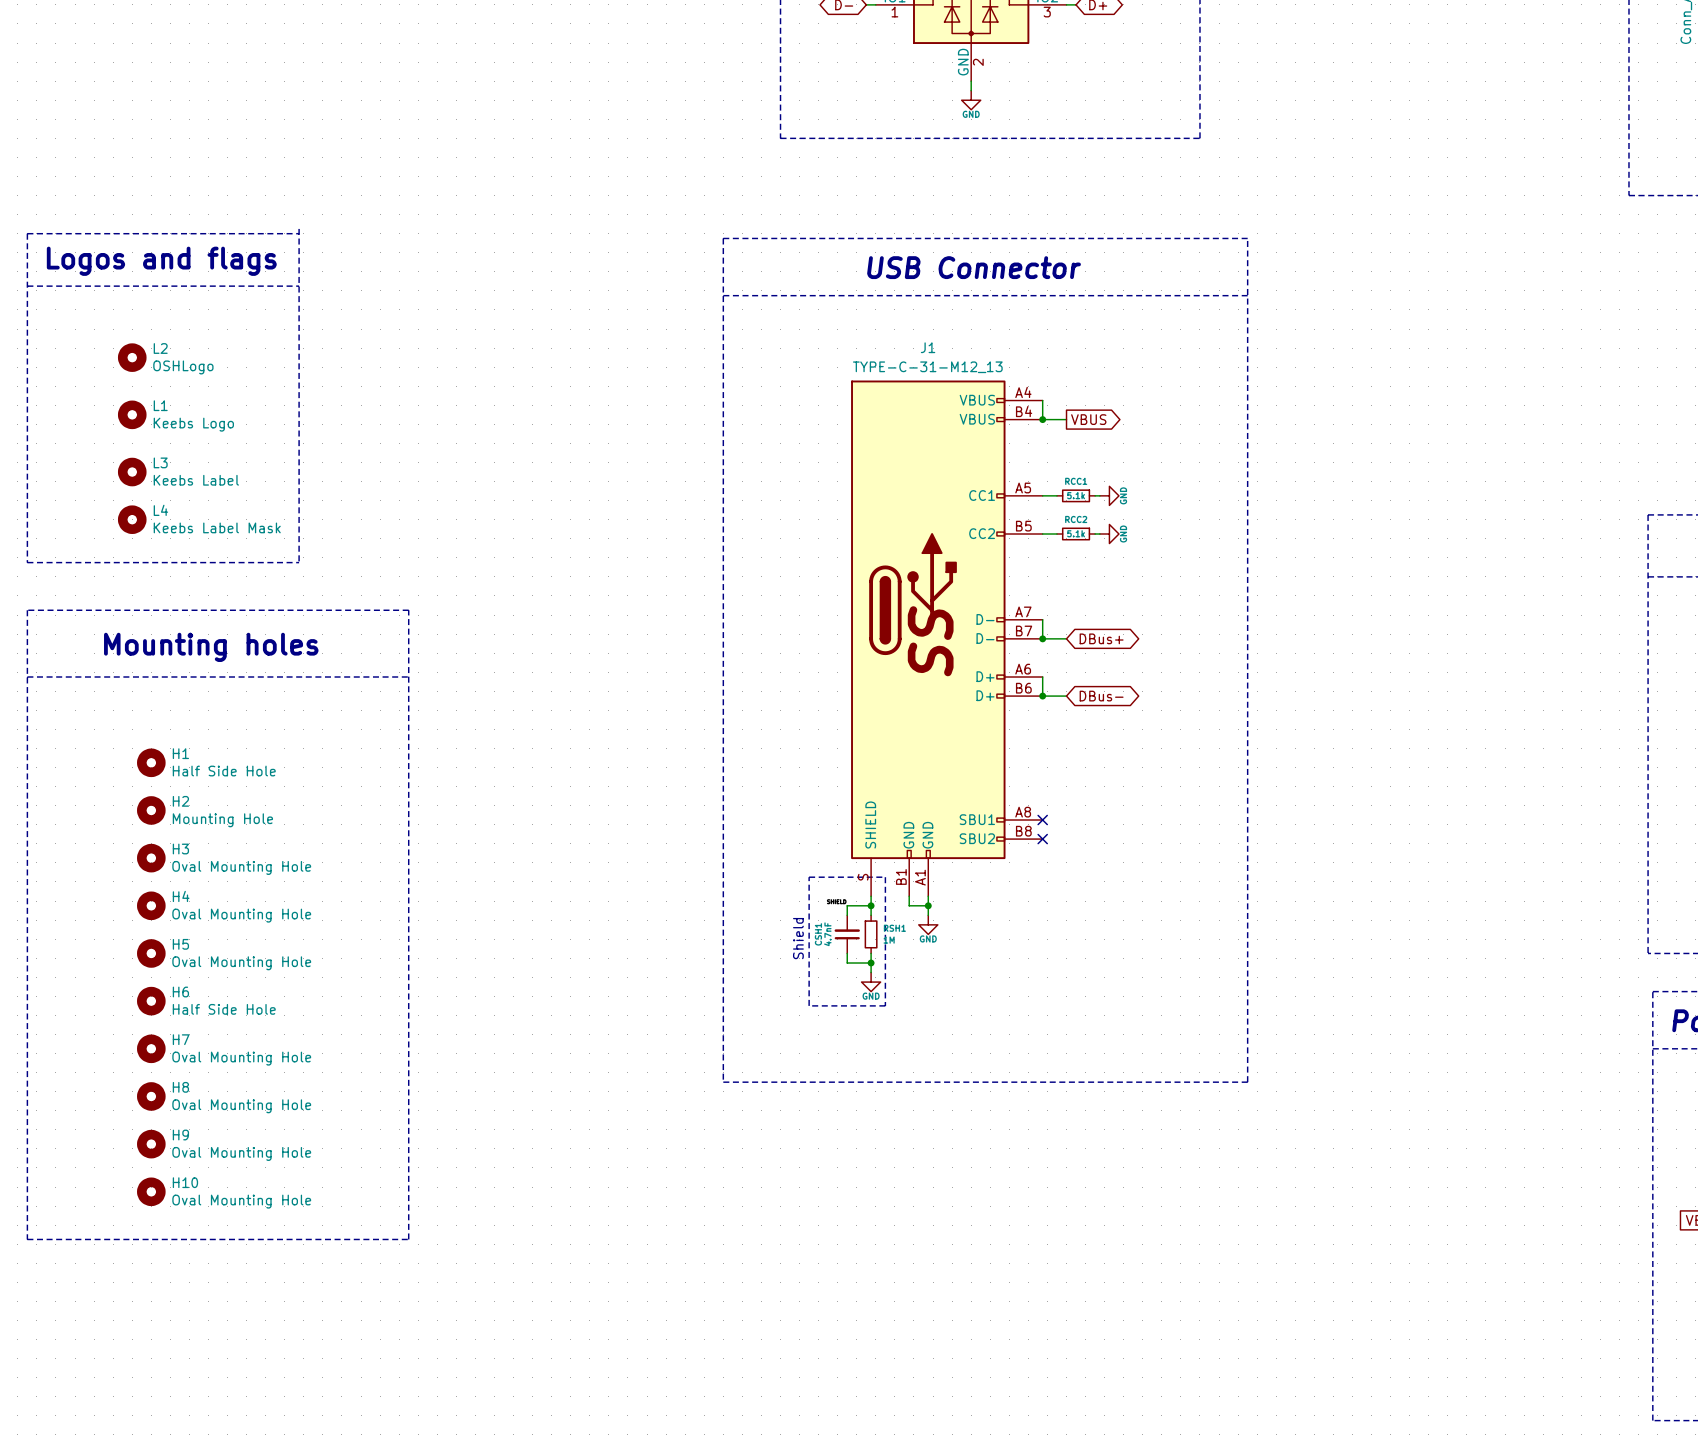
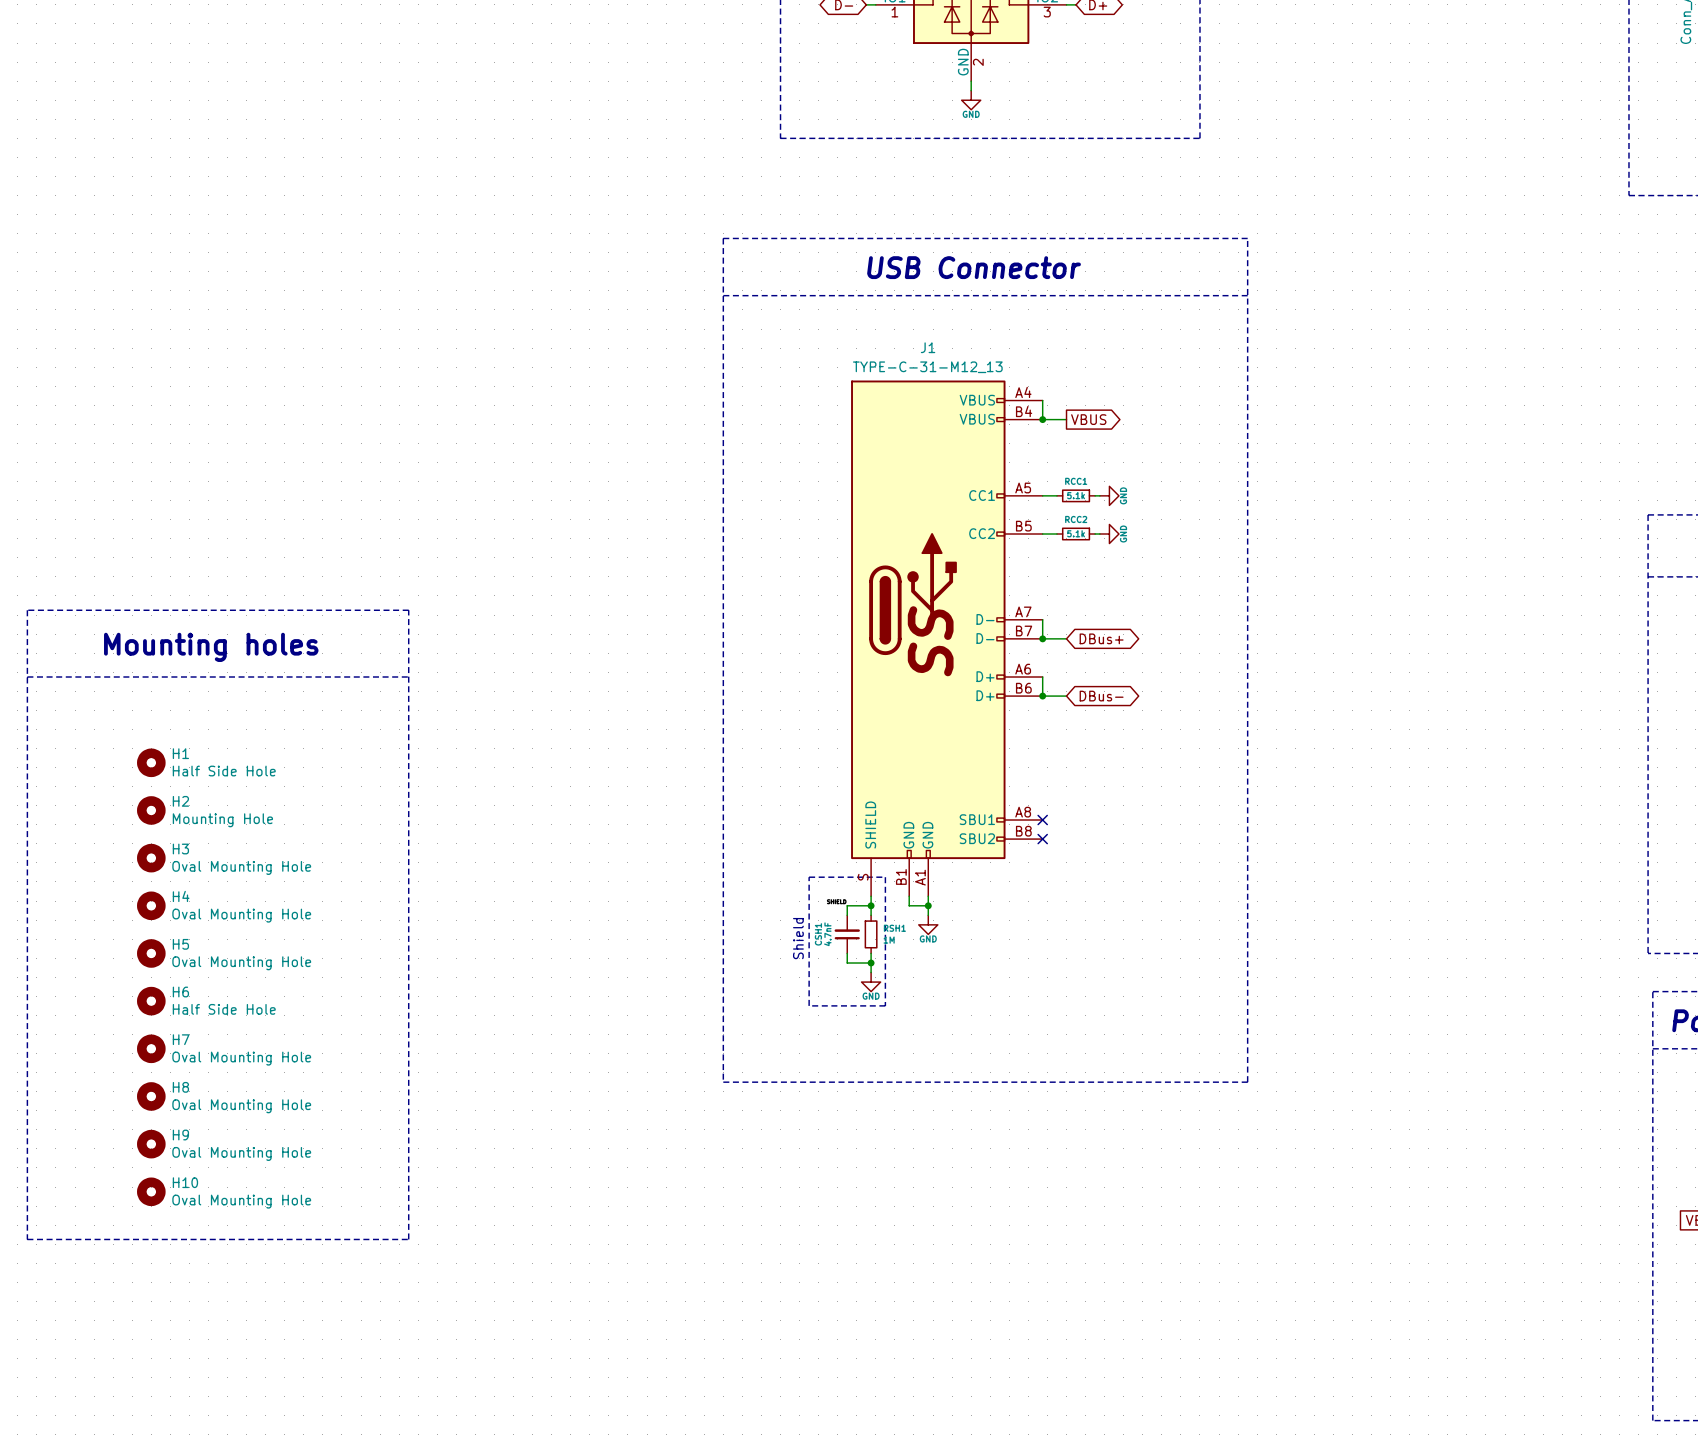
line: (299, 228) (299, 562) (27, 562) (27, 233) (299, 233) -> none
text: Logos and flags (161, 261) -> none
line: (27, 286) (299, 286) -> none
L2: OSHLogo (132, 357) -> none
L1: Keebs Logo (132, 414) -> none
L3: Keebs Label (132, 472) -> none
L4: Keebs Label Mask (132, 519) -> none

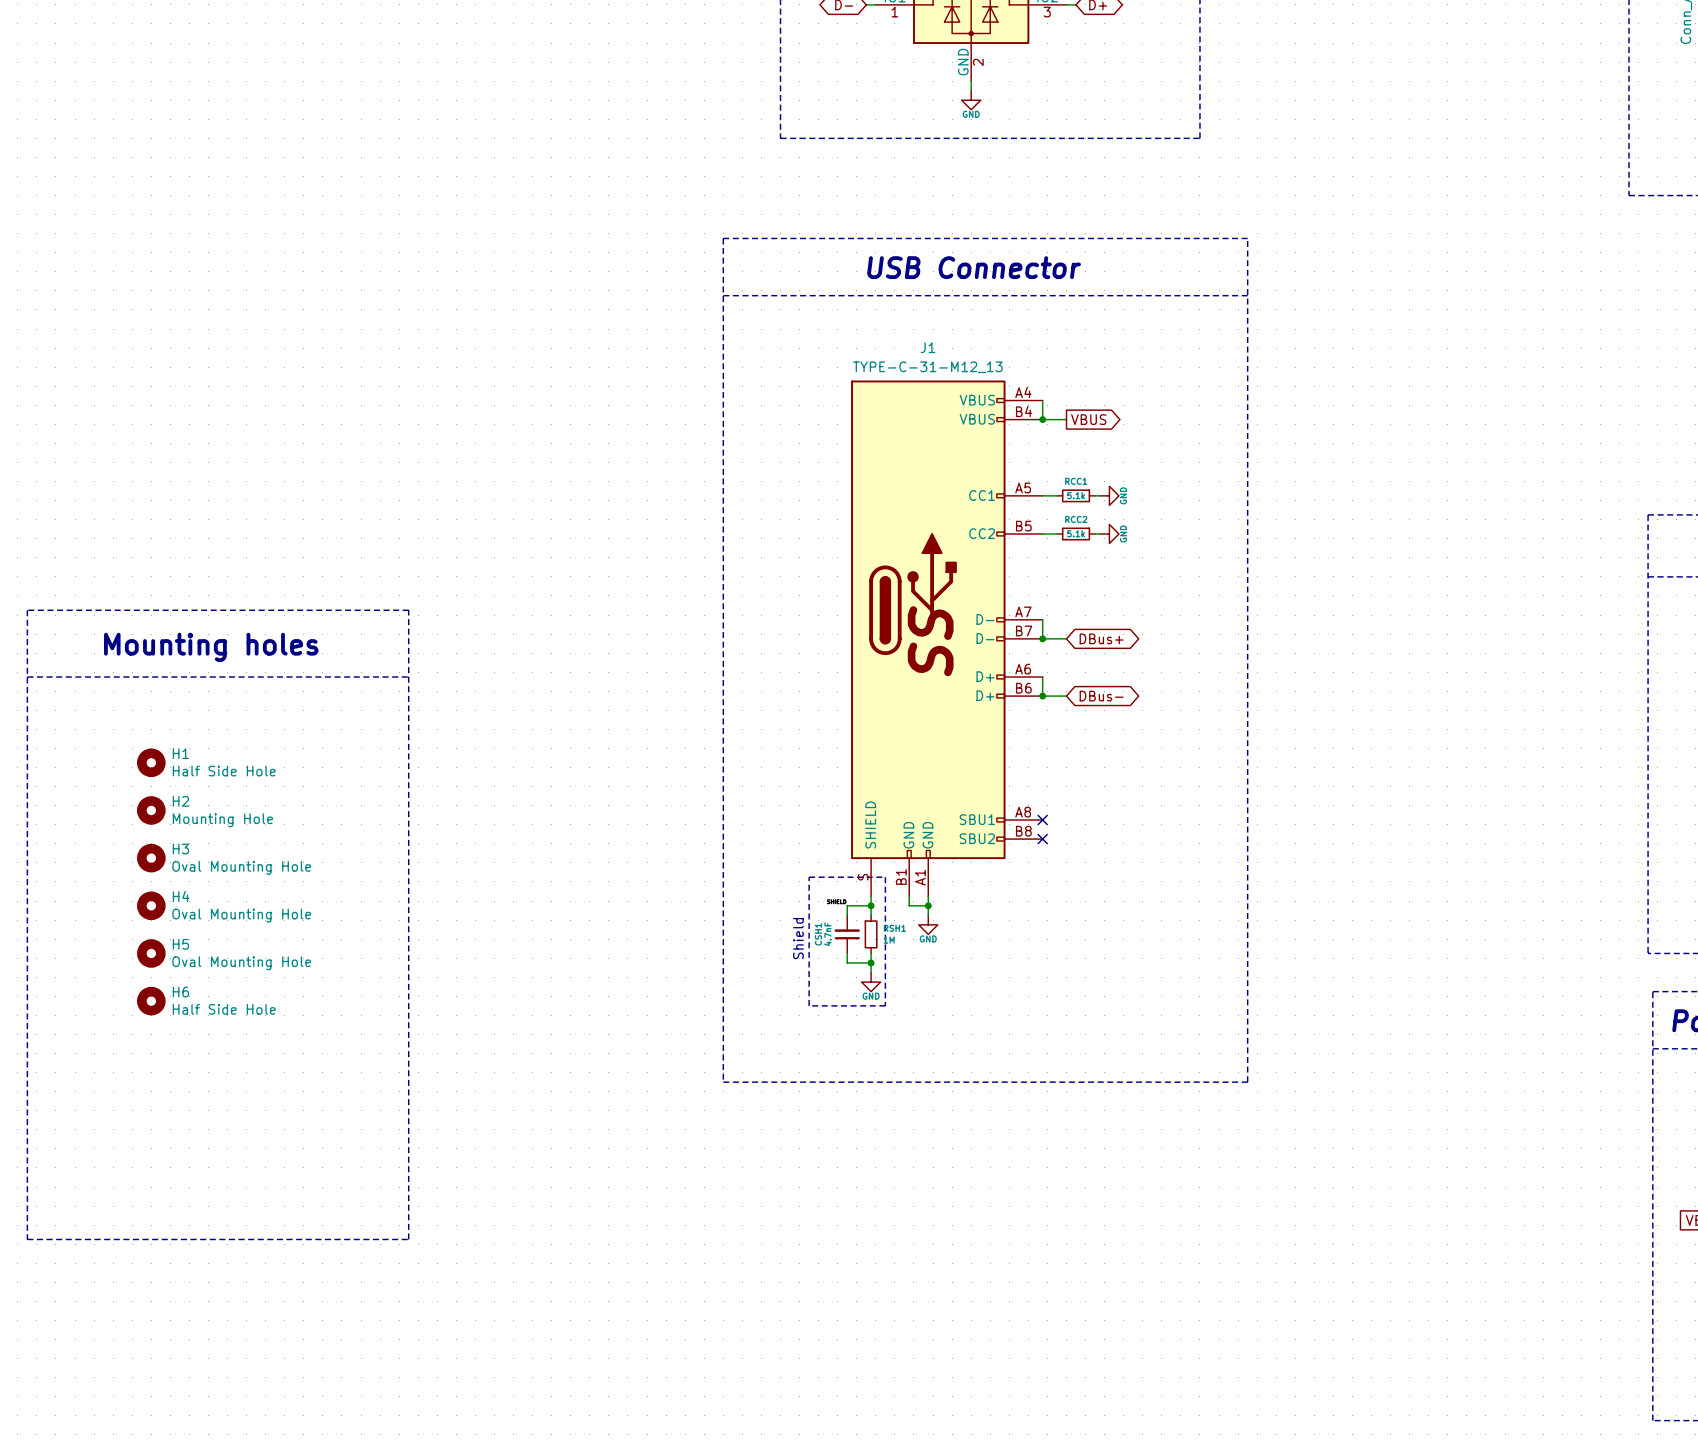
H7: Oval Mounting Hole (151, 1048) -> none
H8: Oval Mounting Hole (151, 1096) -> none
H9: Oval Mounting Hole (151, 1144) -> none
H10: Oval Mounting Hole (151, 1191) -> none

